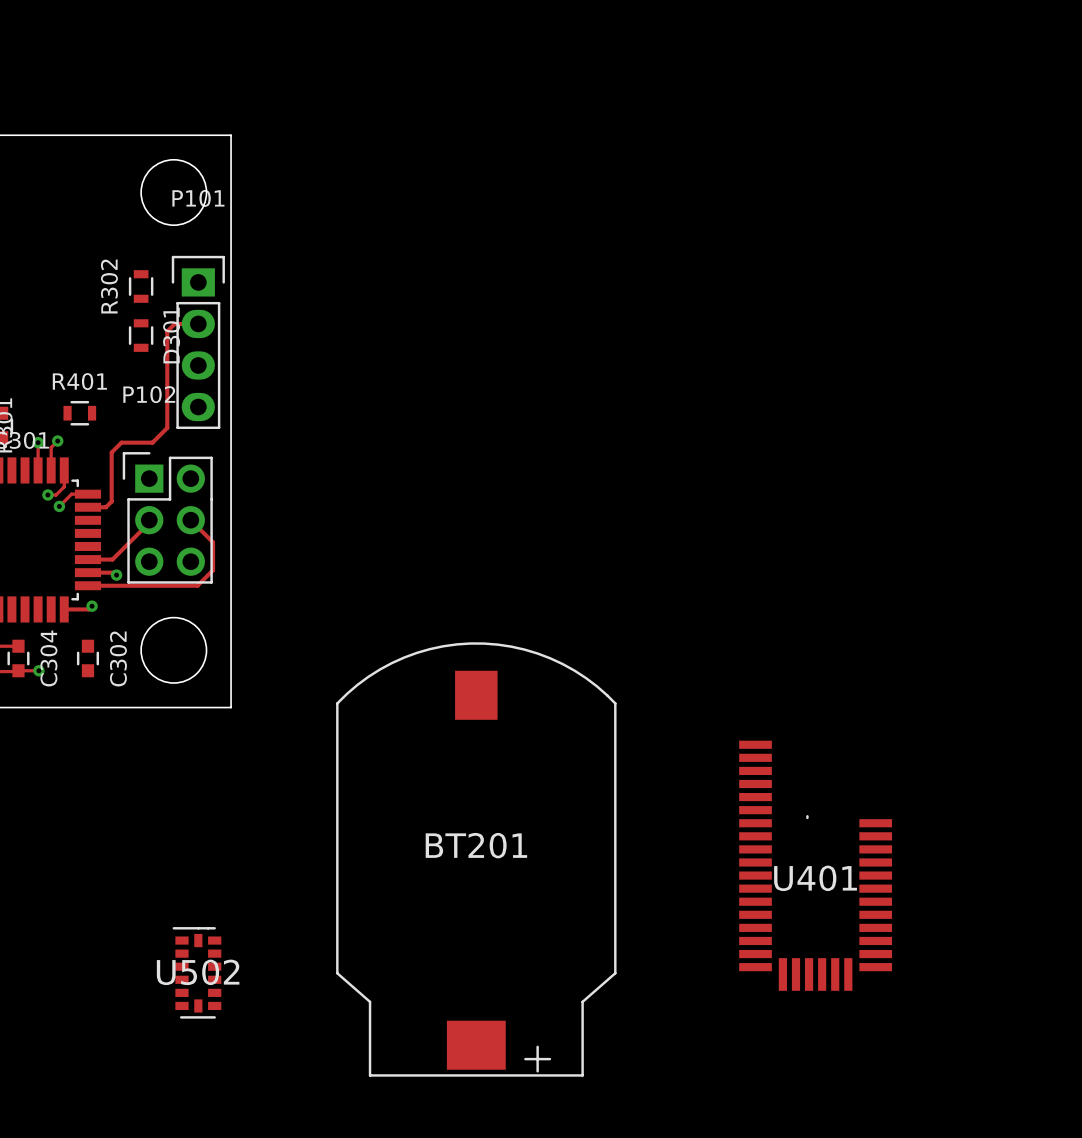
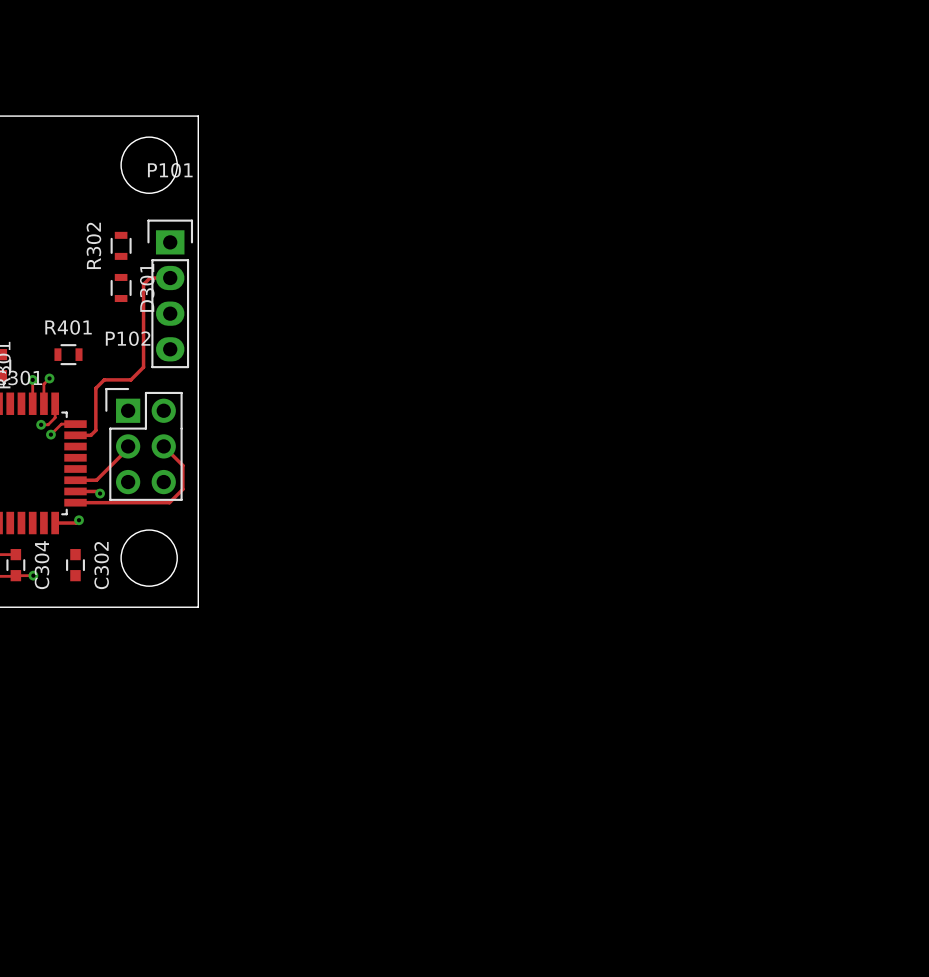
BT201: (476, 859) -> none
U401: (815, 865) -> none
U502: (196, 972) -> none

